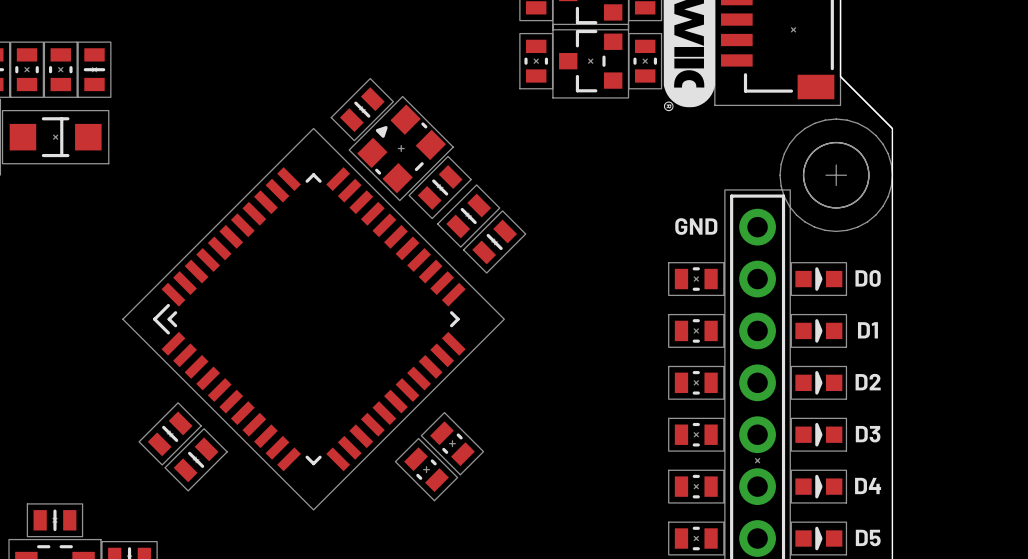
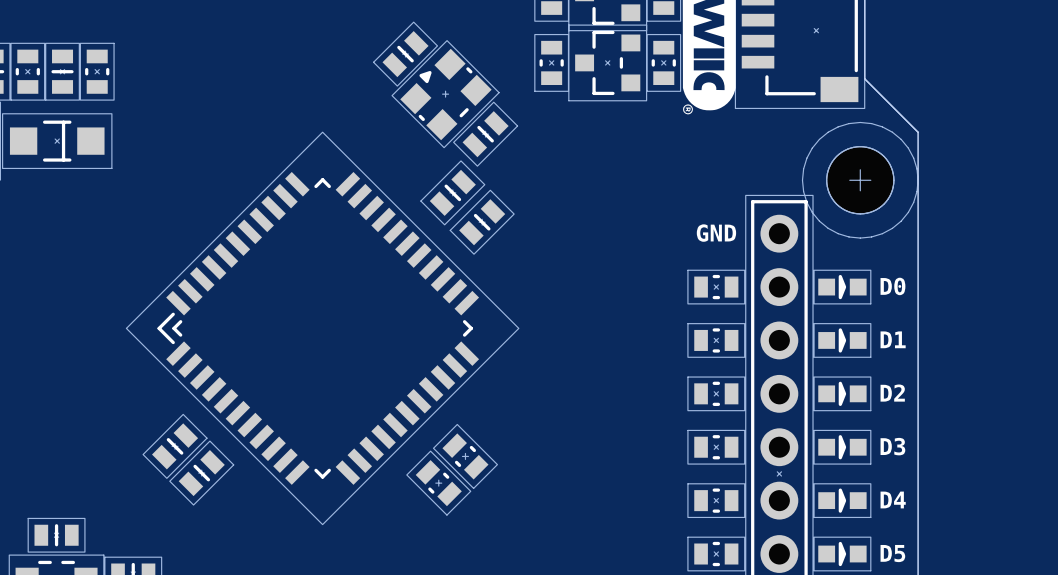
part footprint: [44, 42, 78, 98] -> [45, 43, 80, 101]
part footprint: [78, 42, 111, 98] -> [80, 43, 115, 101]
part: none -> (405, 54)
part: (362, 109) -> none
part: none -> (485, 134)
part position: (401, 148) -> (445, 94)
part: (494, 241) -> none

